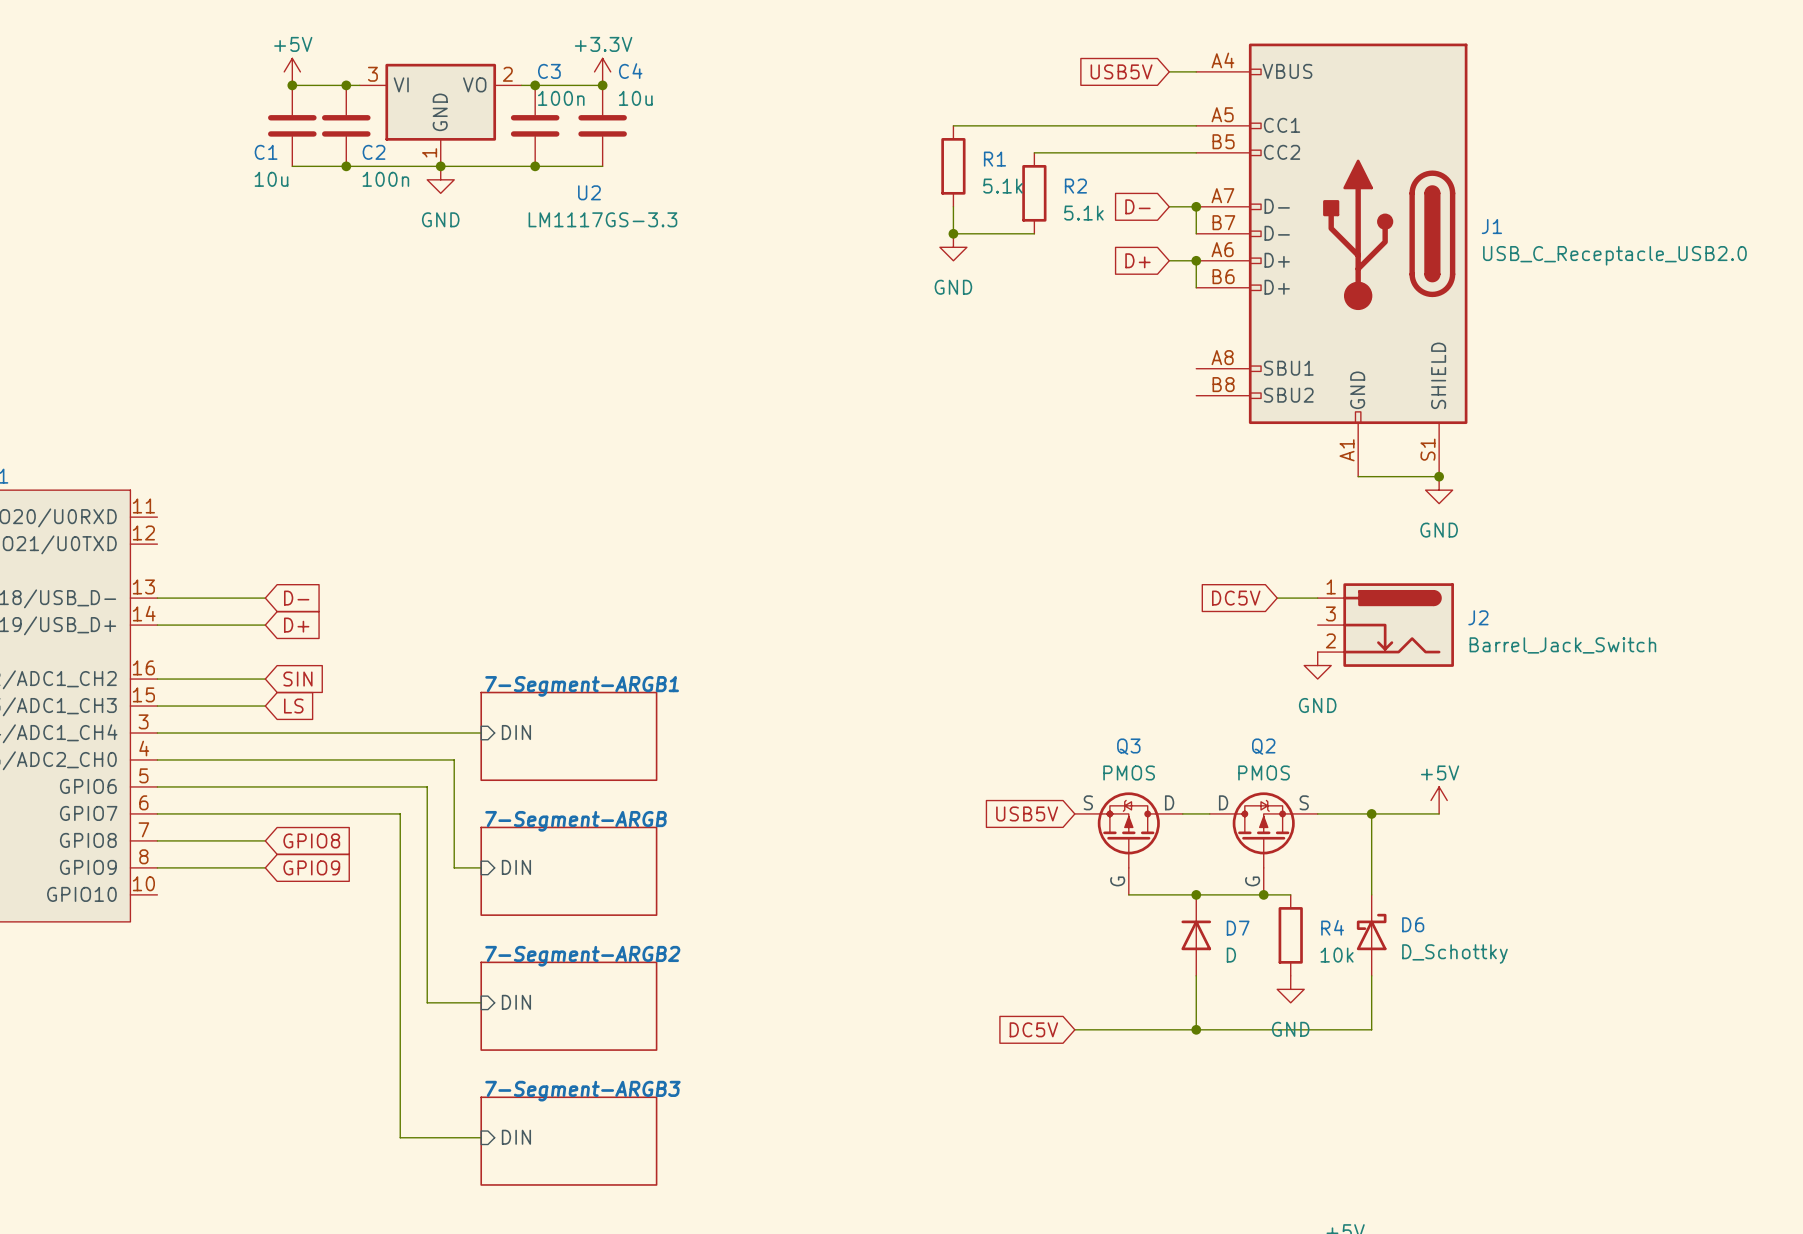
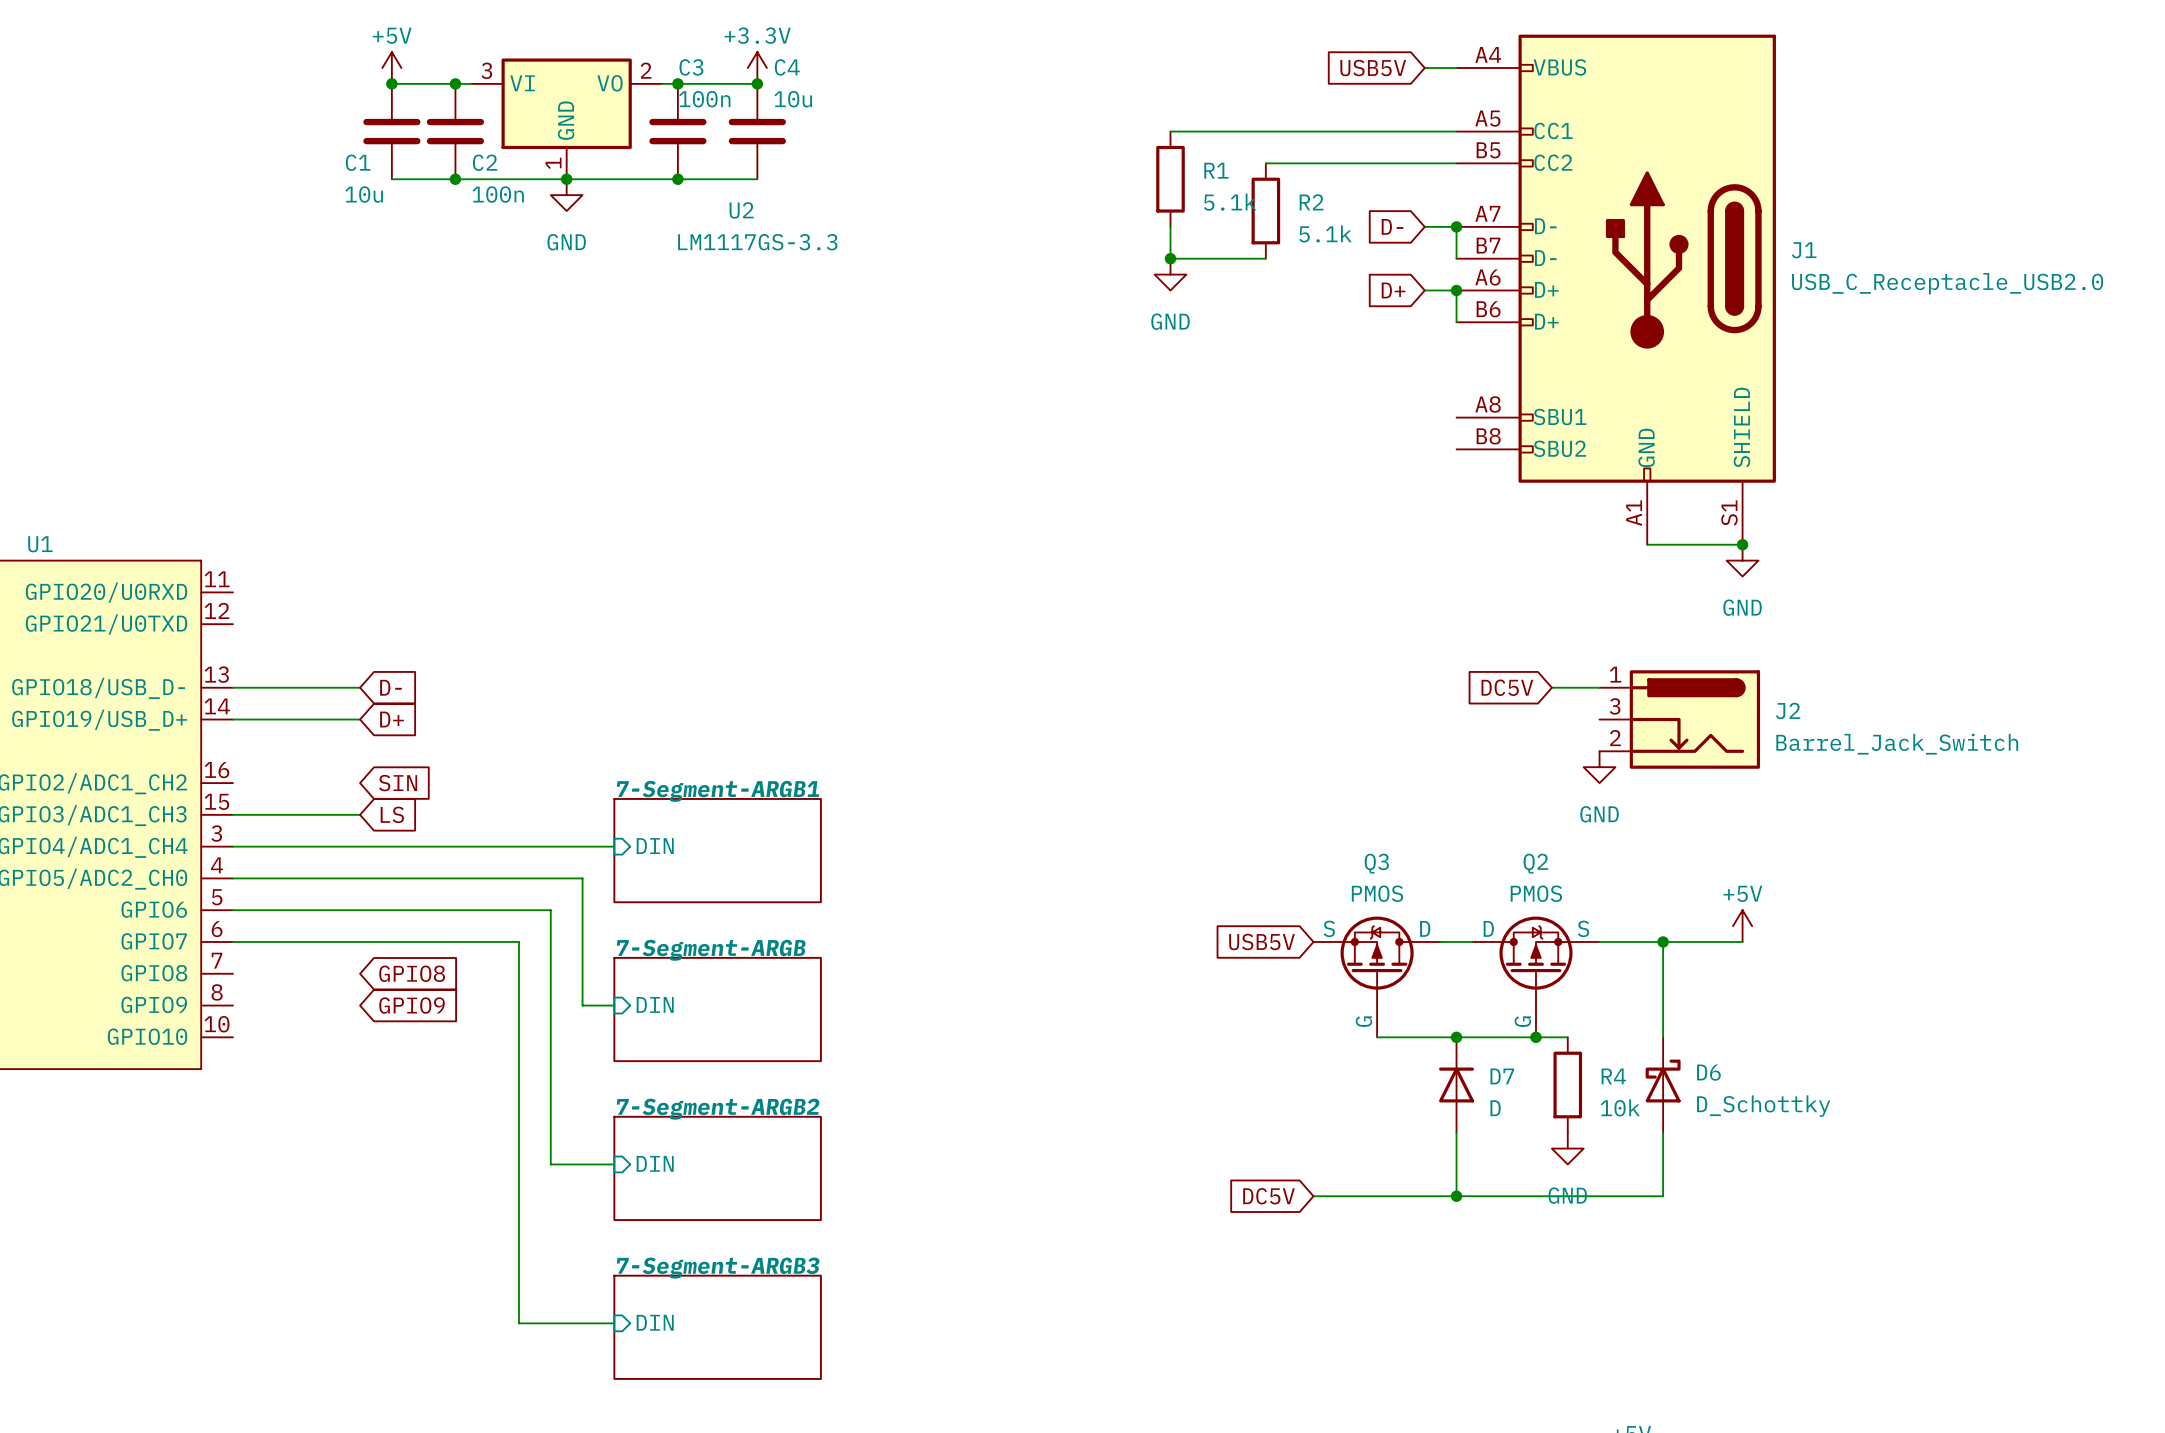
wire: (157, 679) (265, 679) -> none
wire: (157, 840) (265, 840) -> none
wire: (157, 867) (265, 867) -> none

